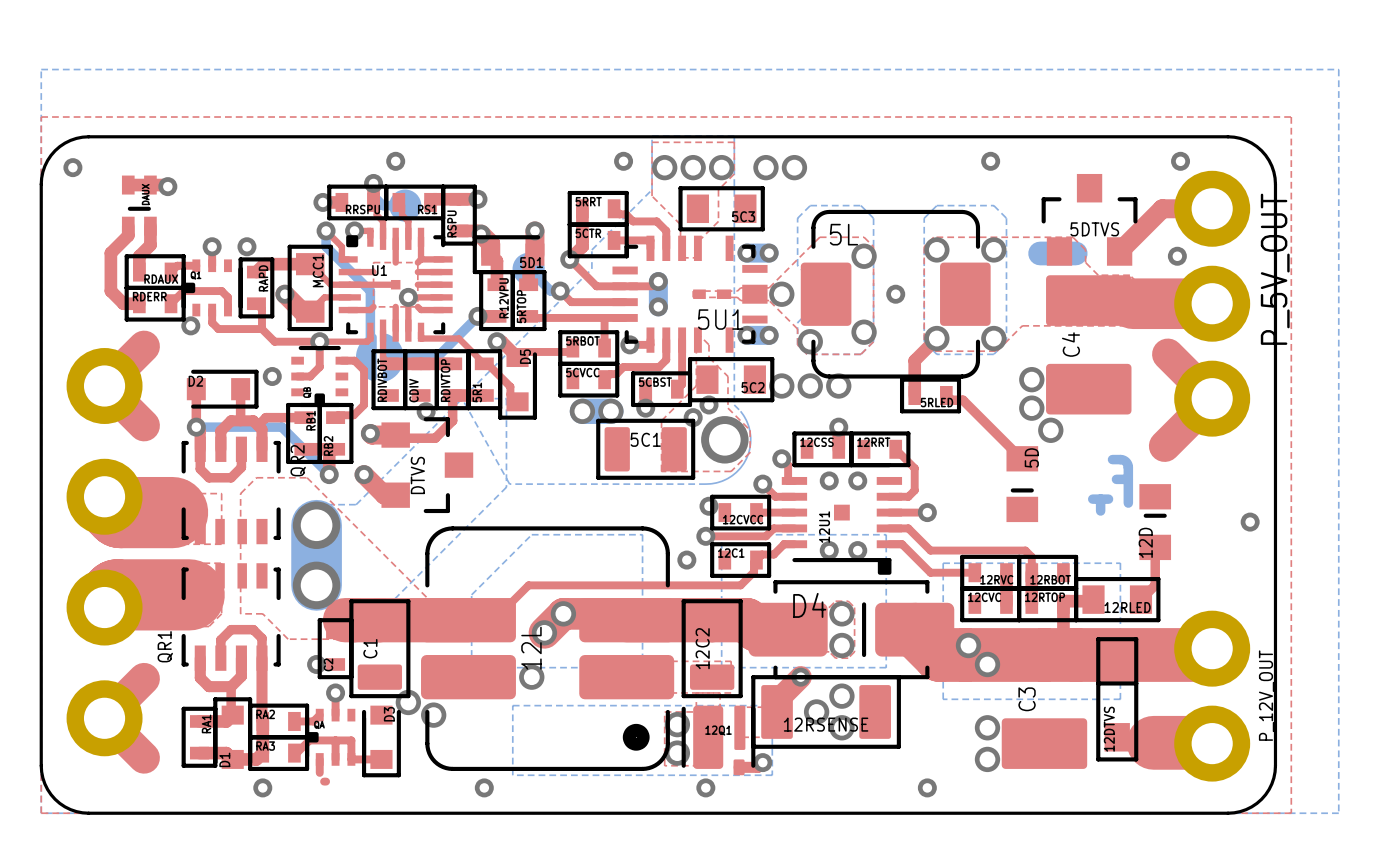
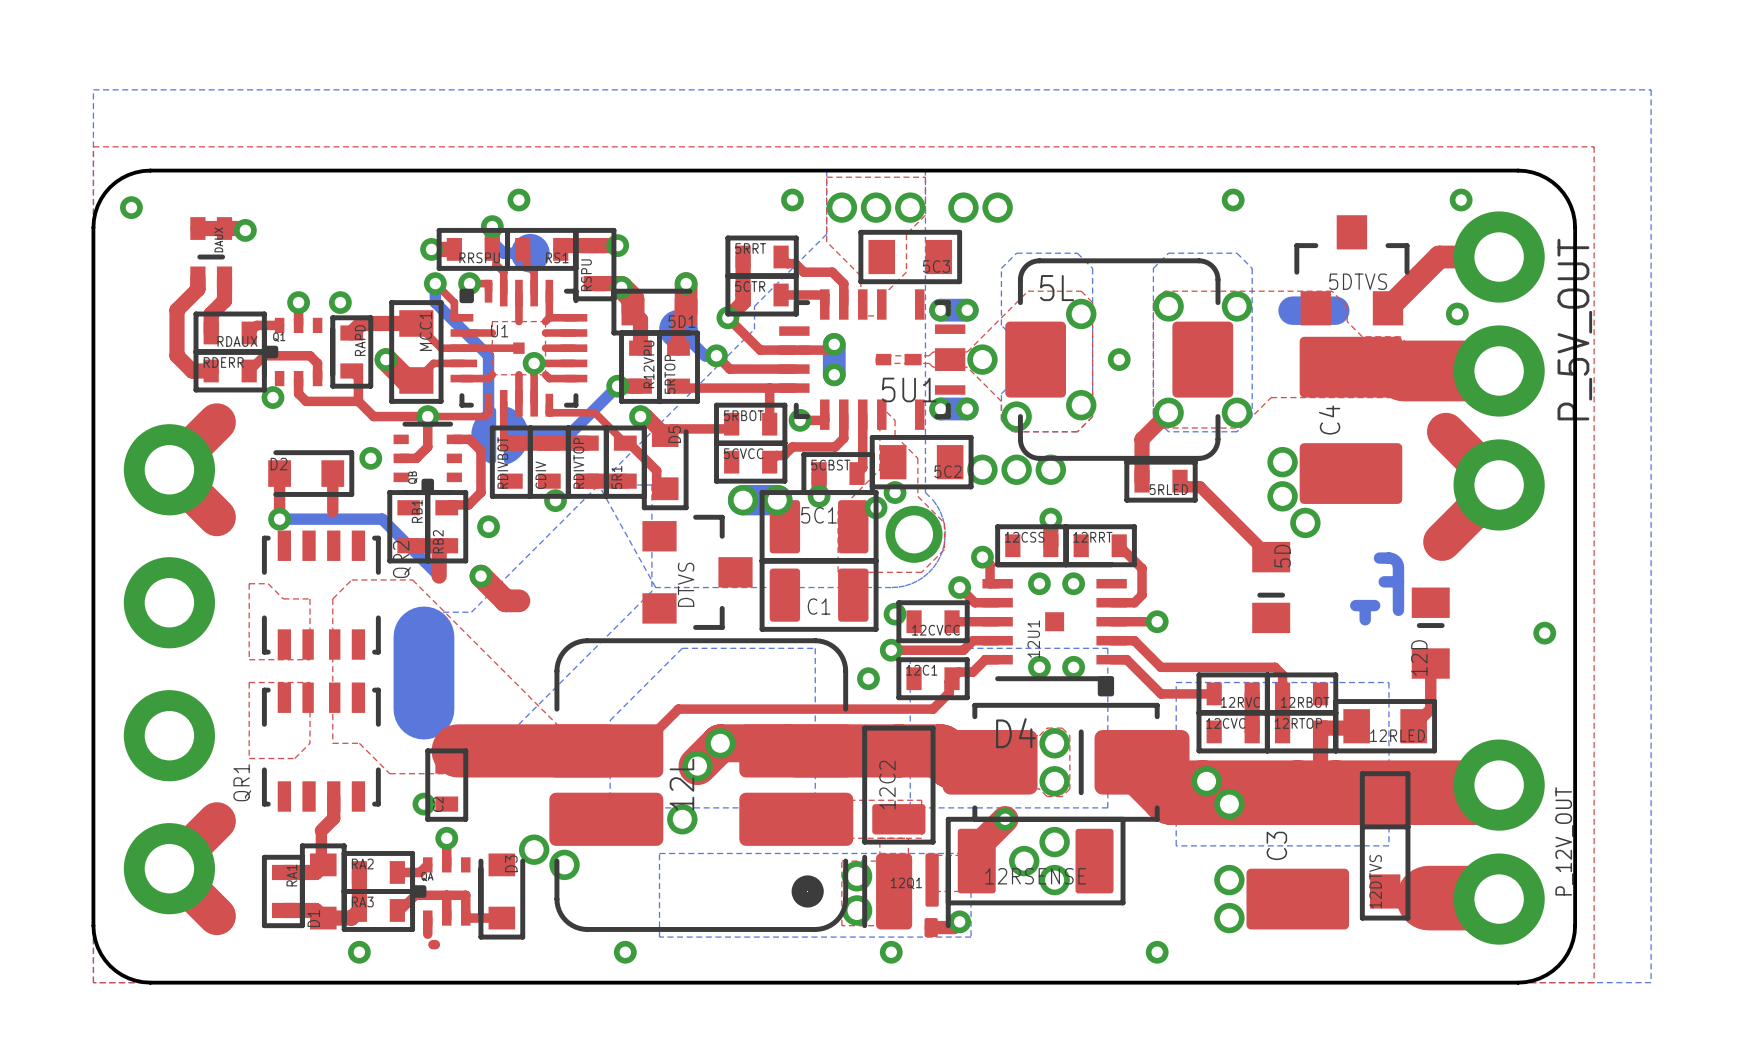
top track: (452, 395) (452, 420) (435, 438) (398, 438) (395, 435) (370, 433) -> none
top track: (303, 417) (265, 417) (258, 425) -> none
top track: (196, 427) (200, 431) (200, 469) (208, 477) (231, 477) (241, 467) (241, 449) -> none
top track: (220, 449) (220, 431) (231, 420) (253, 420) (261, 429) (261, 449) -> none
5C1 position: (645, 449) -> (819, 526)
DTVS position: (427, 465) -> (697, 572)
via: (329, 474) -> none
top track: (104, 496) (120, 512) (172, 512) -> none
via: (316, 525) -> none
via: (316, 585) -> none
top track: (189, 594) (117, 594) (104, 607) -> none
C1 rotation: 0° (379, 648) -> 90° clockwise (819, 595)
C1 position: (379, 648) -> (819, 595)
top track: (200, 658) (200, 677) (208, 686) (231, 686) -> none
top track: (220, 658) (220, 639) (231, 629) (253, 629) (261, 638) (261, 720) -> none

